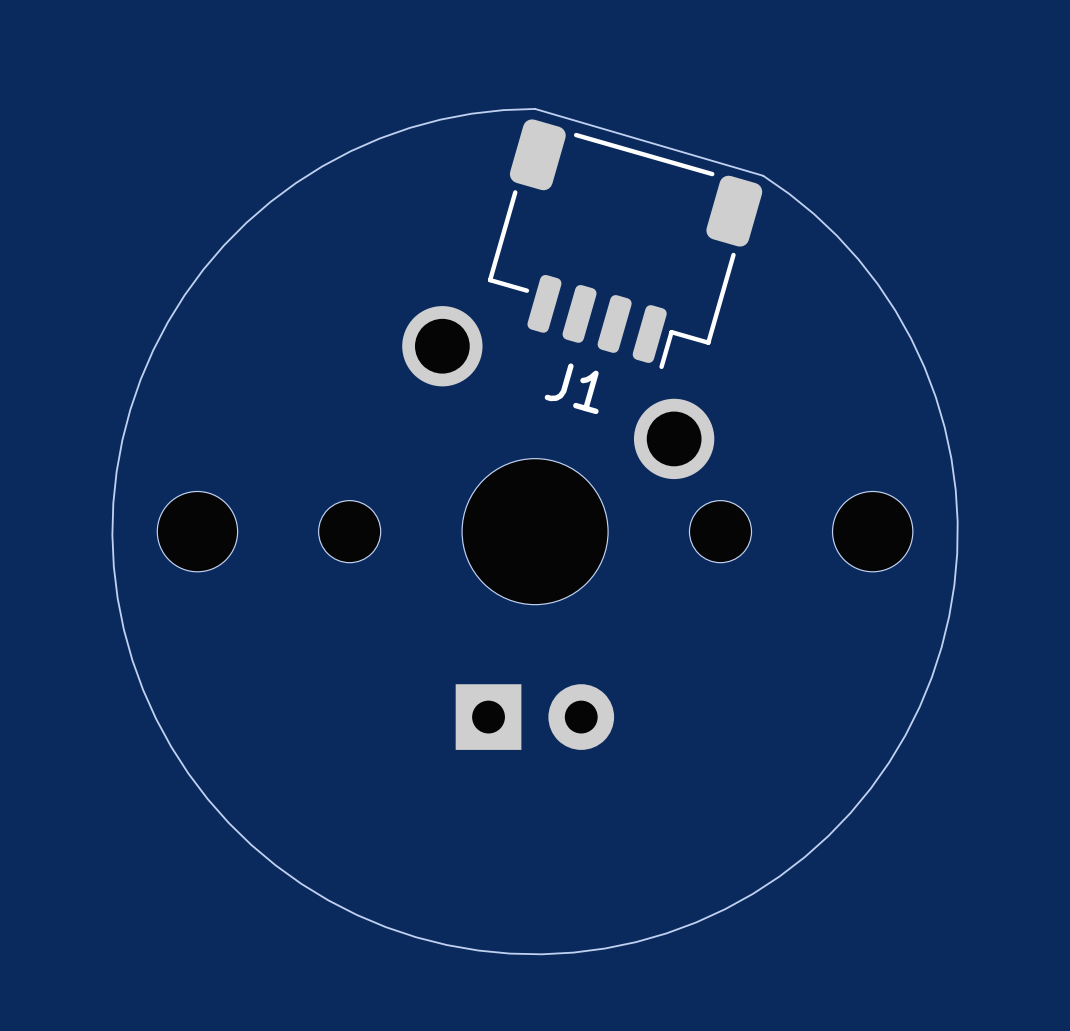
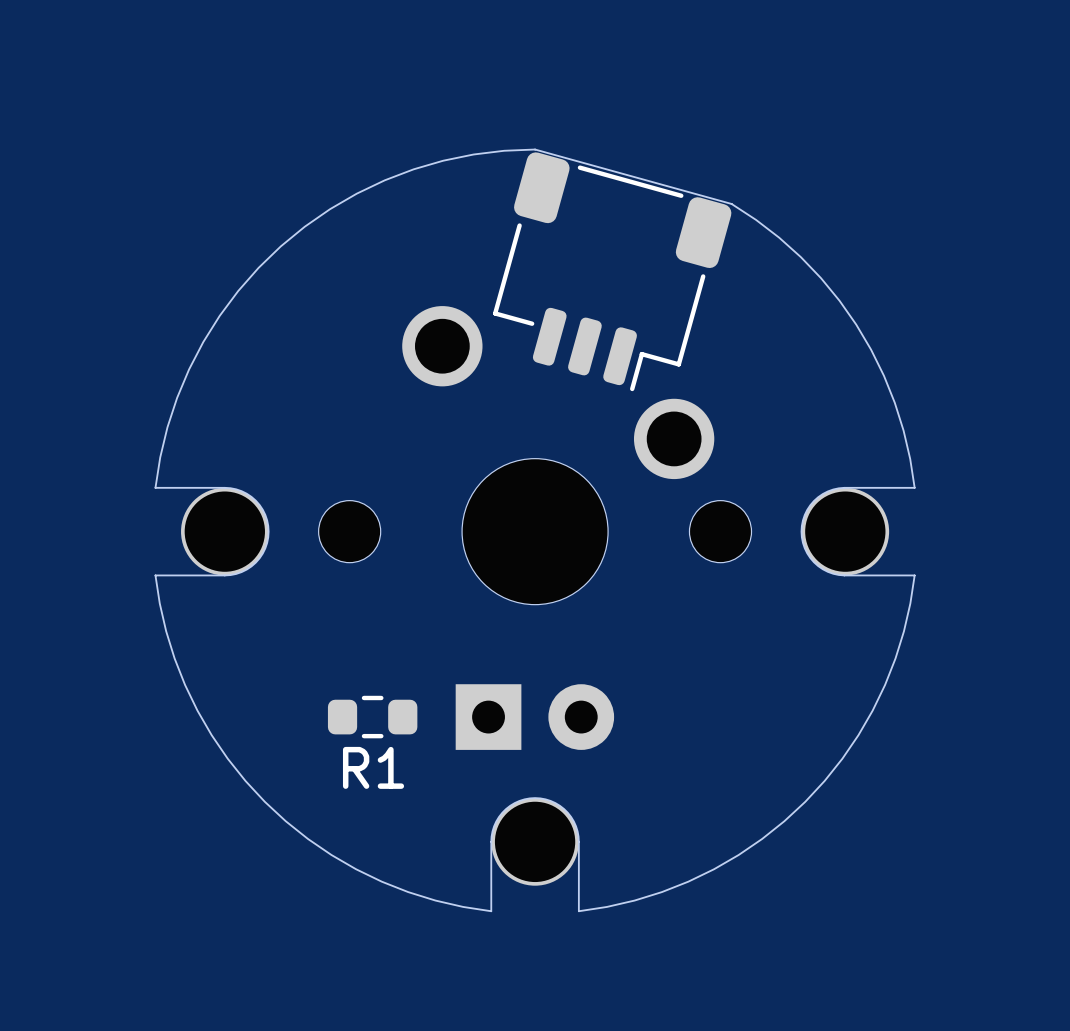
board edge: (535, 108) (763, 175) (813, 213) (836, 235) (877, 284) (895, 310) (924, 367) (944, 427) (955, 489) (957, 521) (954, 585) (941, 647) (931, 677) (919, 706) (889, 762) (850, 812) (804, 857) (779, 876) (753, 893) (696, 922) (636, 942) (573, 952) (541, 954) (509, 953) (447, 945) (416, 937) (356, 914) (301, 883) (251, 844) (228, 822) (207, 798) (171, 746) (143, 689) (123, 629) (113, 566) (112, 534) (116, 471) (130, 409) (140, 379) (167, 322) (184, 295) (203, 269) (246, 222) (270, 202) (322, 166) (379, 138) (409, 127) (471, 113) (535, 108) -> (535, 149) (731, 203) (779, 237) (821, 278) (856, 324) (883, 375) (903, 430) (914, 487) (844, 487) (827, 491) (818, 497) (807, 510) (801, 526) (802, 542) (814, 562) (833, 573) (914, 575) (903, 631) (885, 684) (872, 710) (858, 735) (824, 780) (805, 801) (762, 838) (714, 869) (661, 892) (607, 906) (578, 911) (578, 841) (573, 821) (564, 809) (550, 800) (540, 798) (524, 799) (514, 803) (502, 812) (492, 831) (491, 911) (435, 900) (408, 892) (356, 869) (331, 855) (307, 838) (264, 801) (227, 758) (197, 710) (174, 658) (159, 603) (155, 575) (224, 575) (246, 569) (259, 558) (265, 548) (268, 537) (267, 520) (255, 500) (236, 489) (155, 487) (167, 427) (177, 397) (203, 342) (238, 291) (280, 246) (304, 226) (356, 193) (413, 169) (473, 154) (535, 149)
J1: (625, 244) -> none
part: none -> (612, 271)
part footprint: [157, 491, 238, 572] -> [181, 487, 269, 576]
part footprint: [832, 491, 913, 572] -> [801, 487, 890, 576]
R1: none -> (372, 717)
part: none -> (535, 841)

